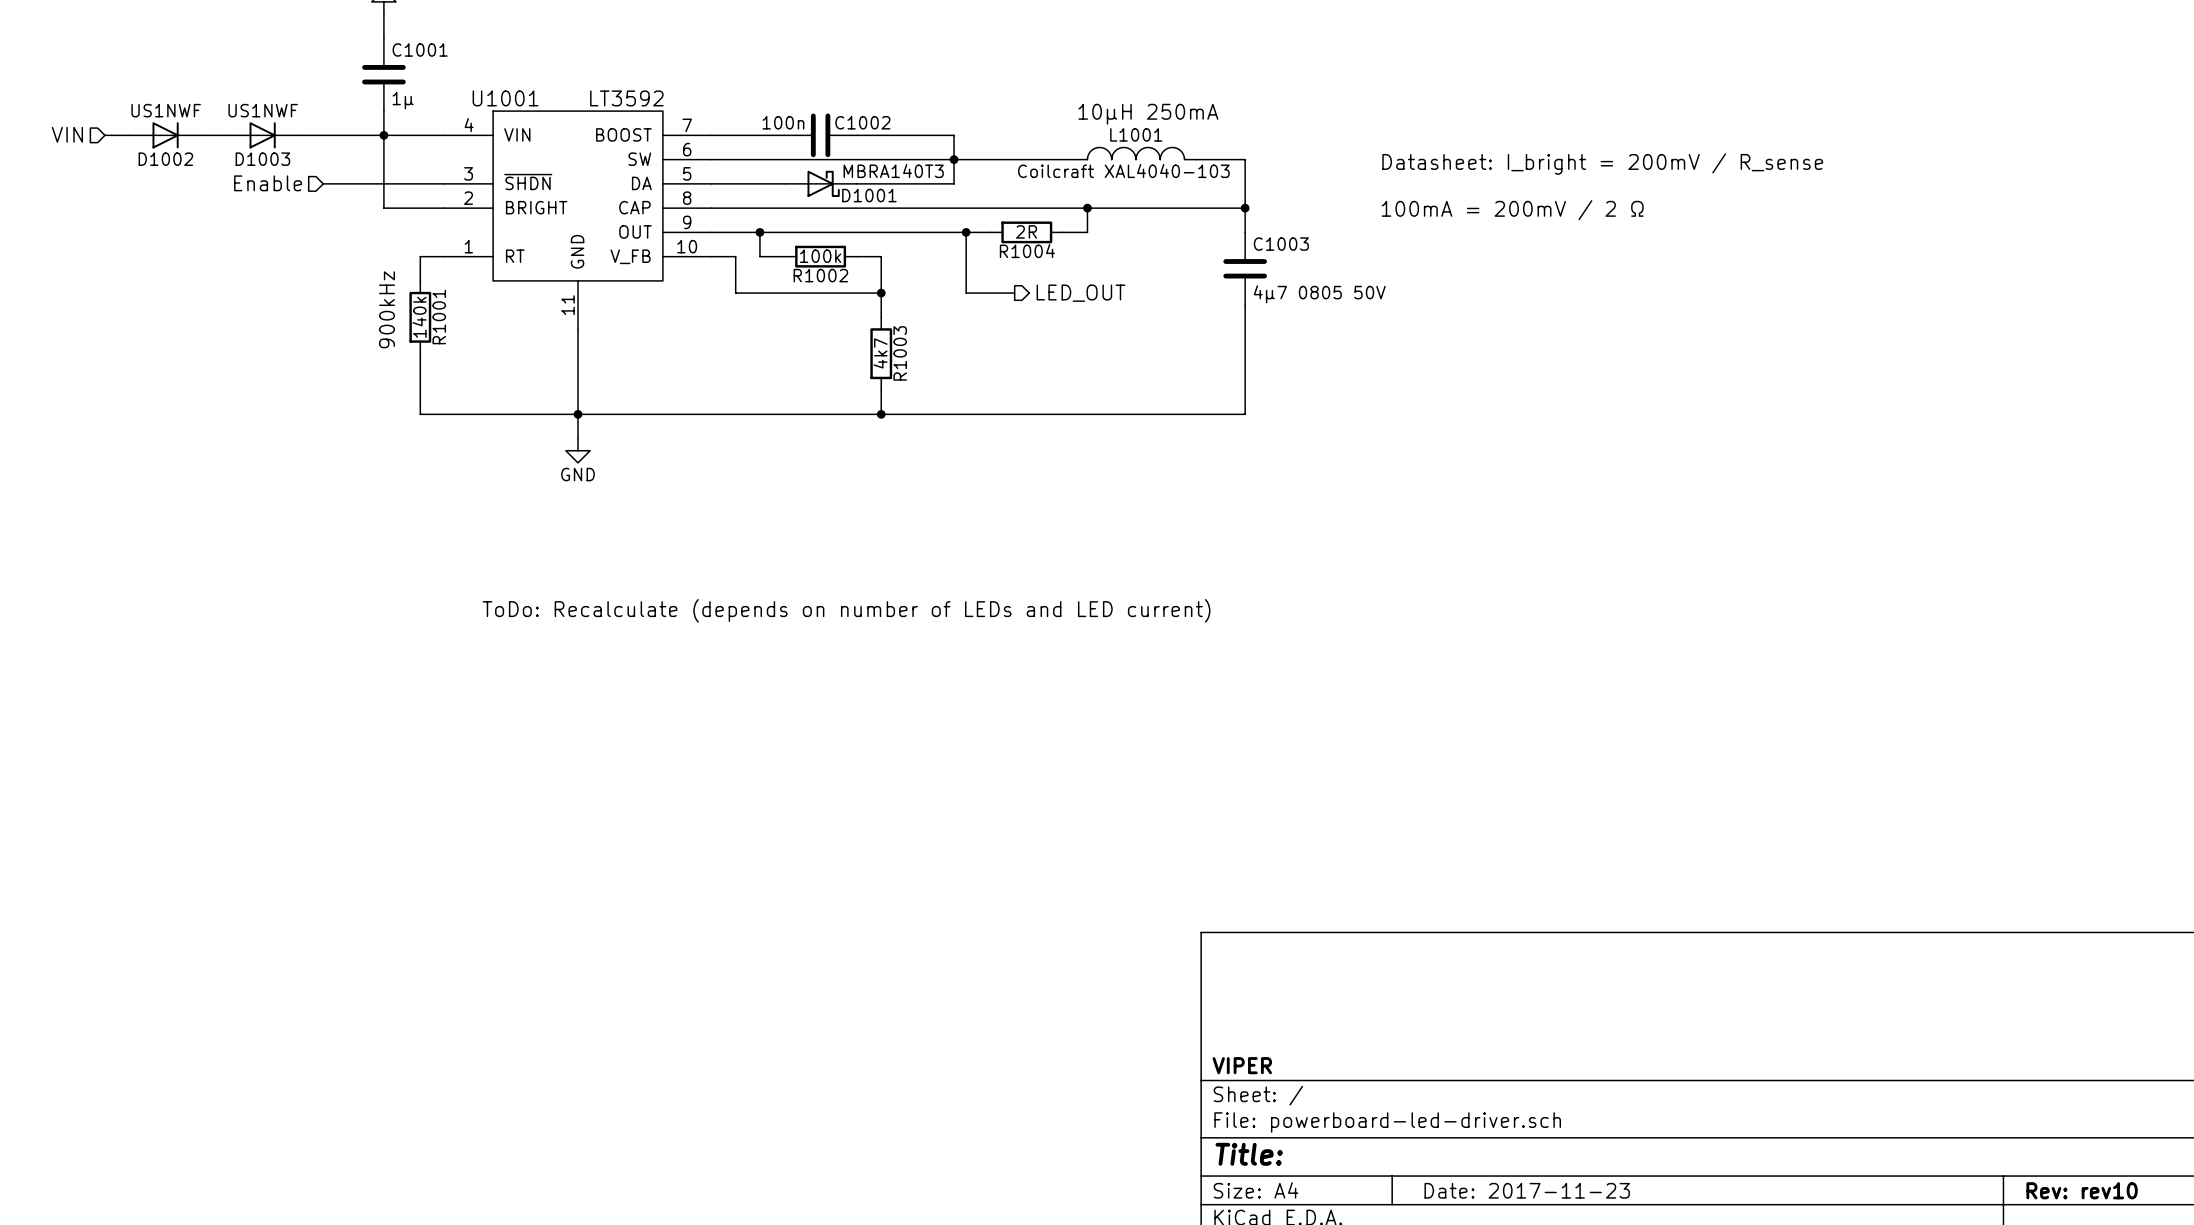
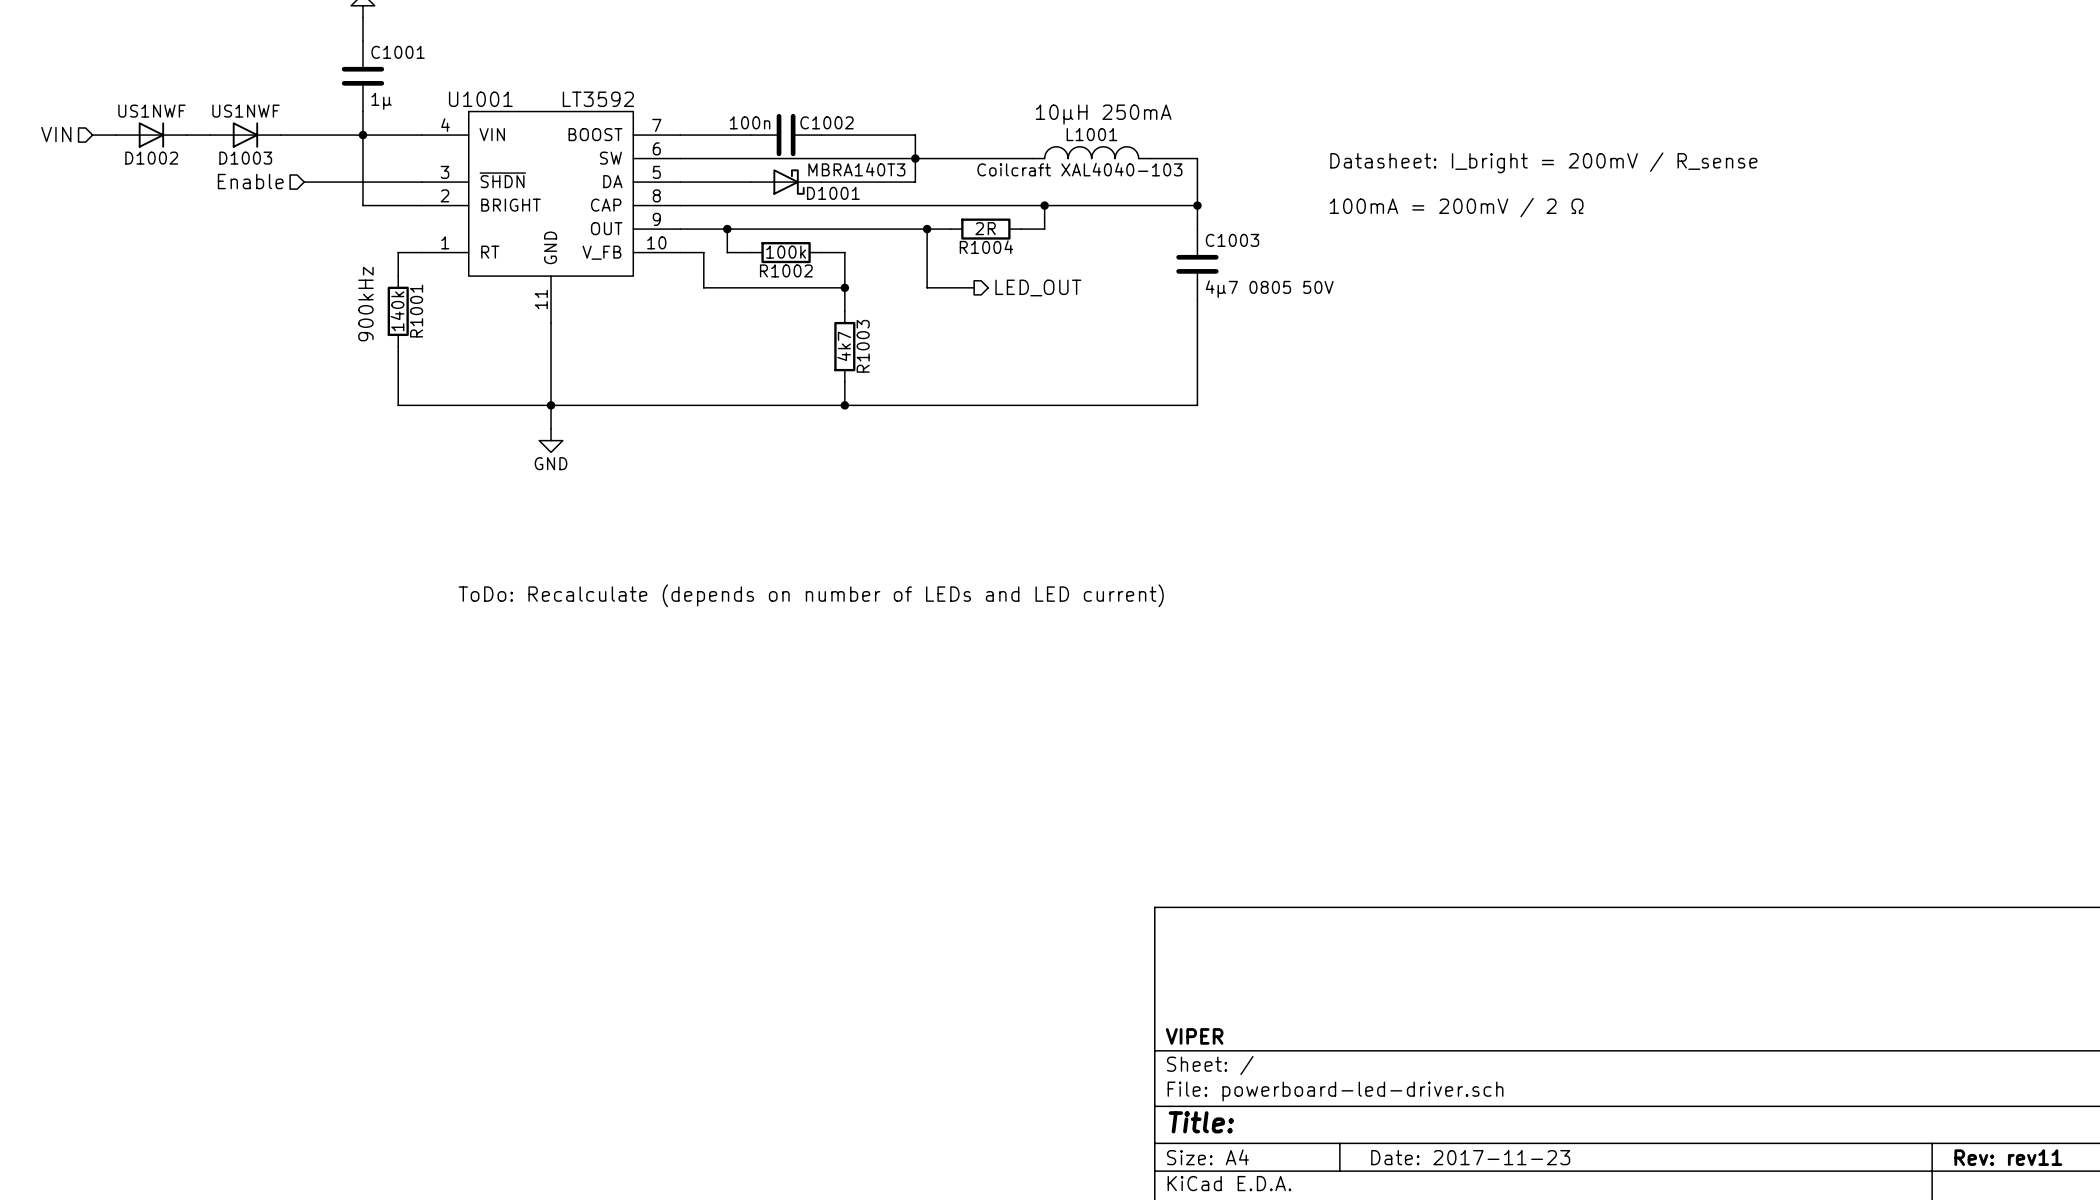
title block: Rev: rev10 (2082, 1190) -> Rev: rev11 (2008, 1157)

